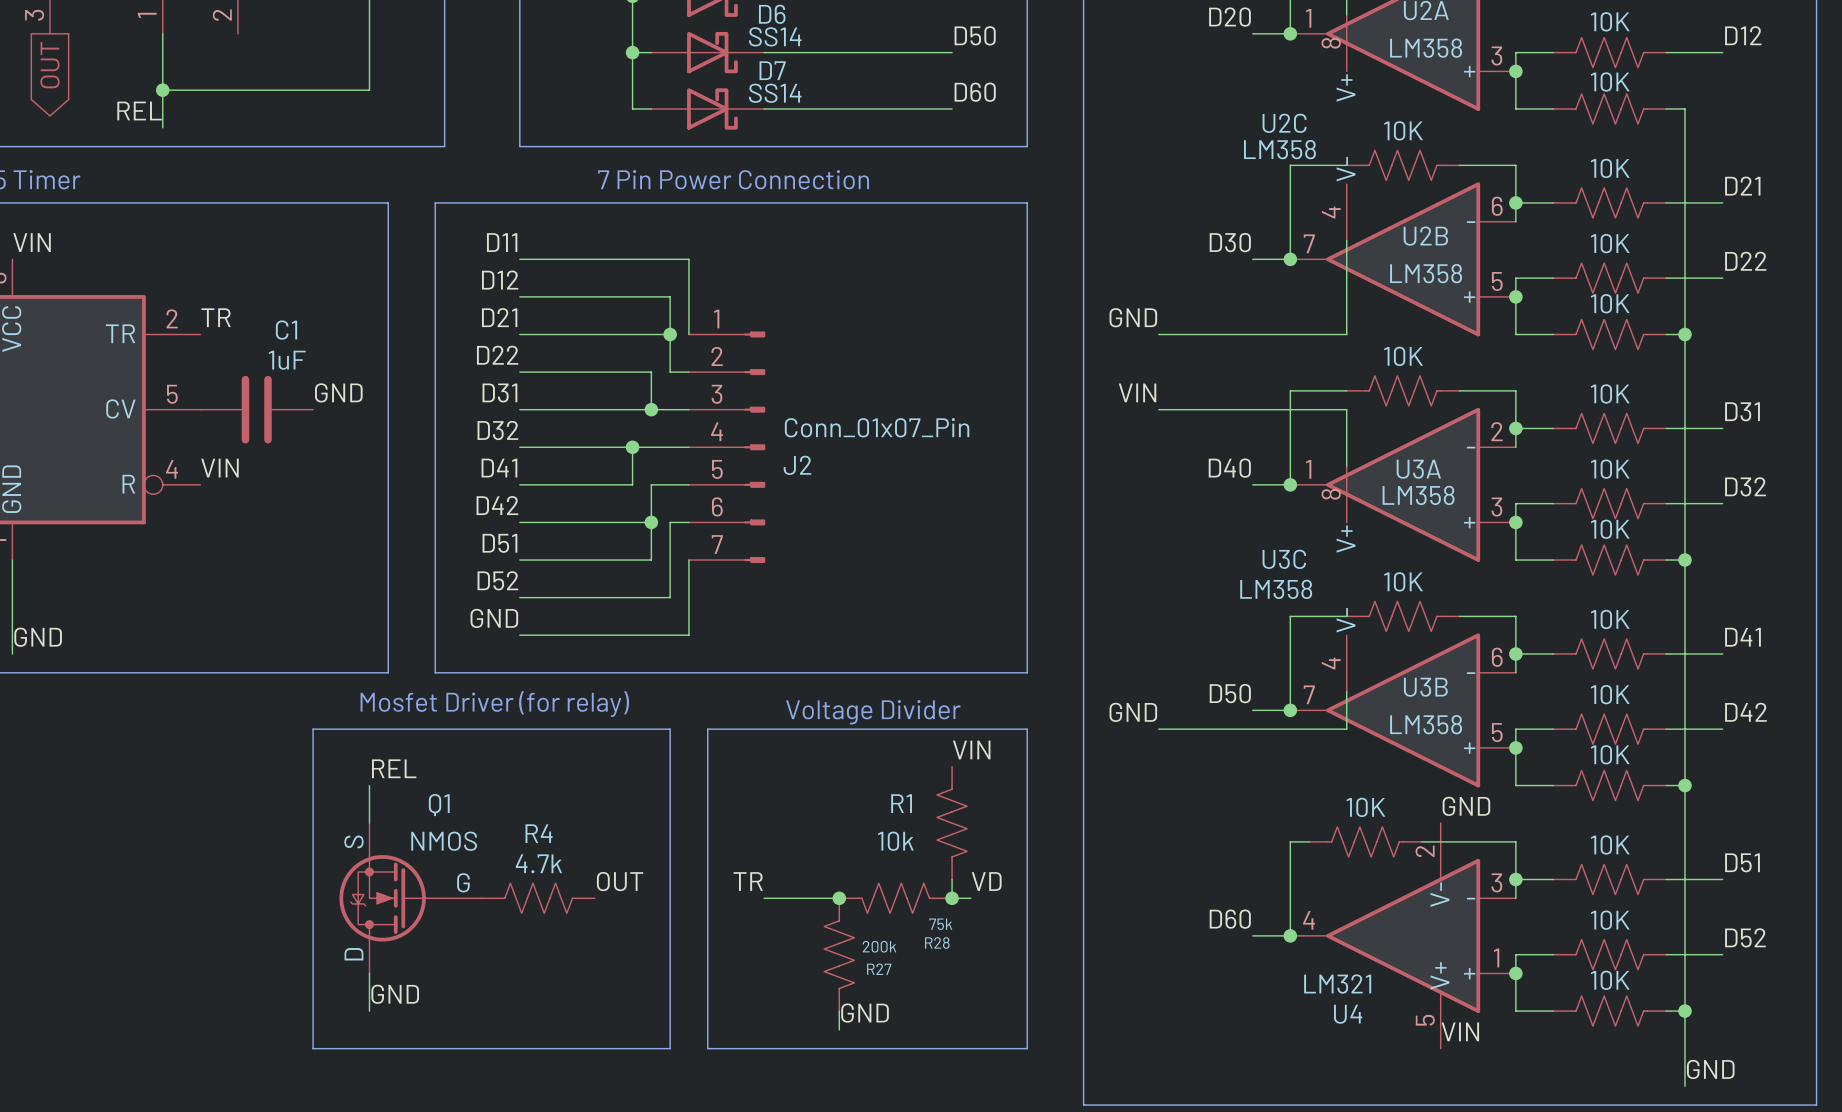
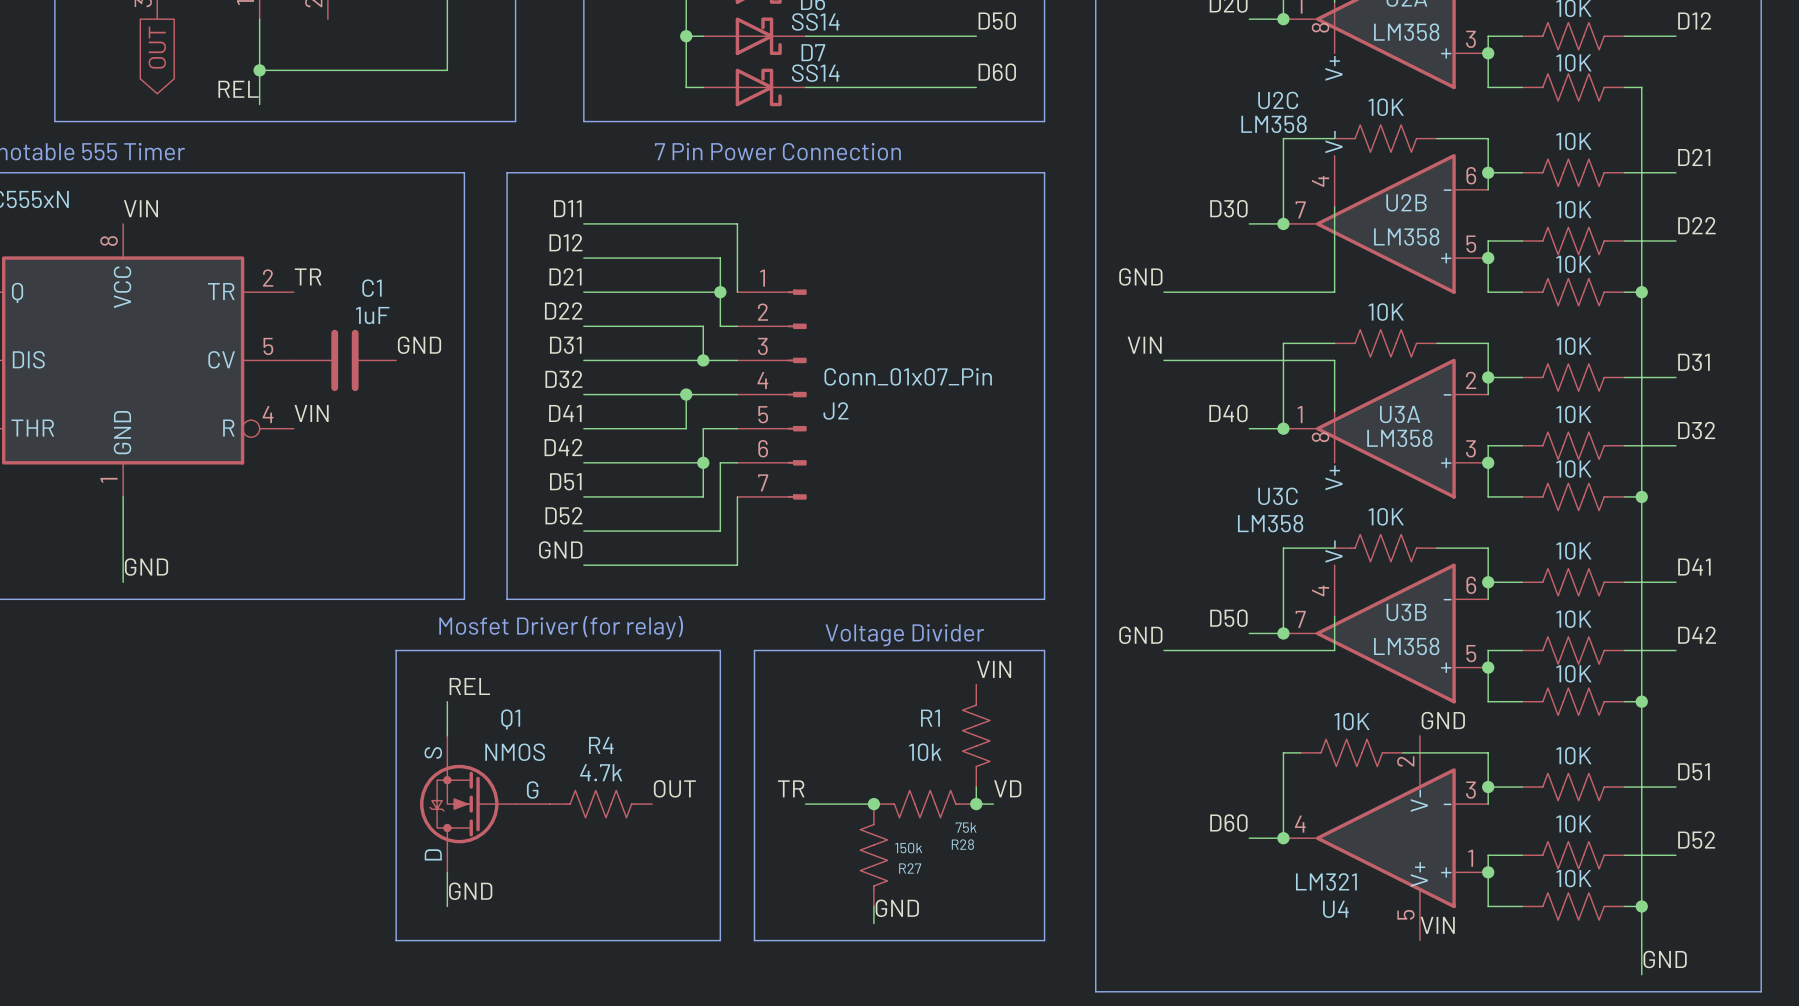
R27 value: 200k (879, 946) -> 150k (908, 848)

